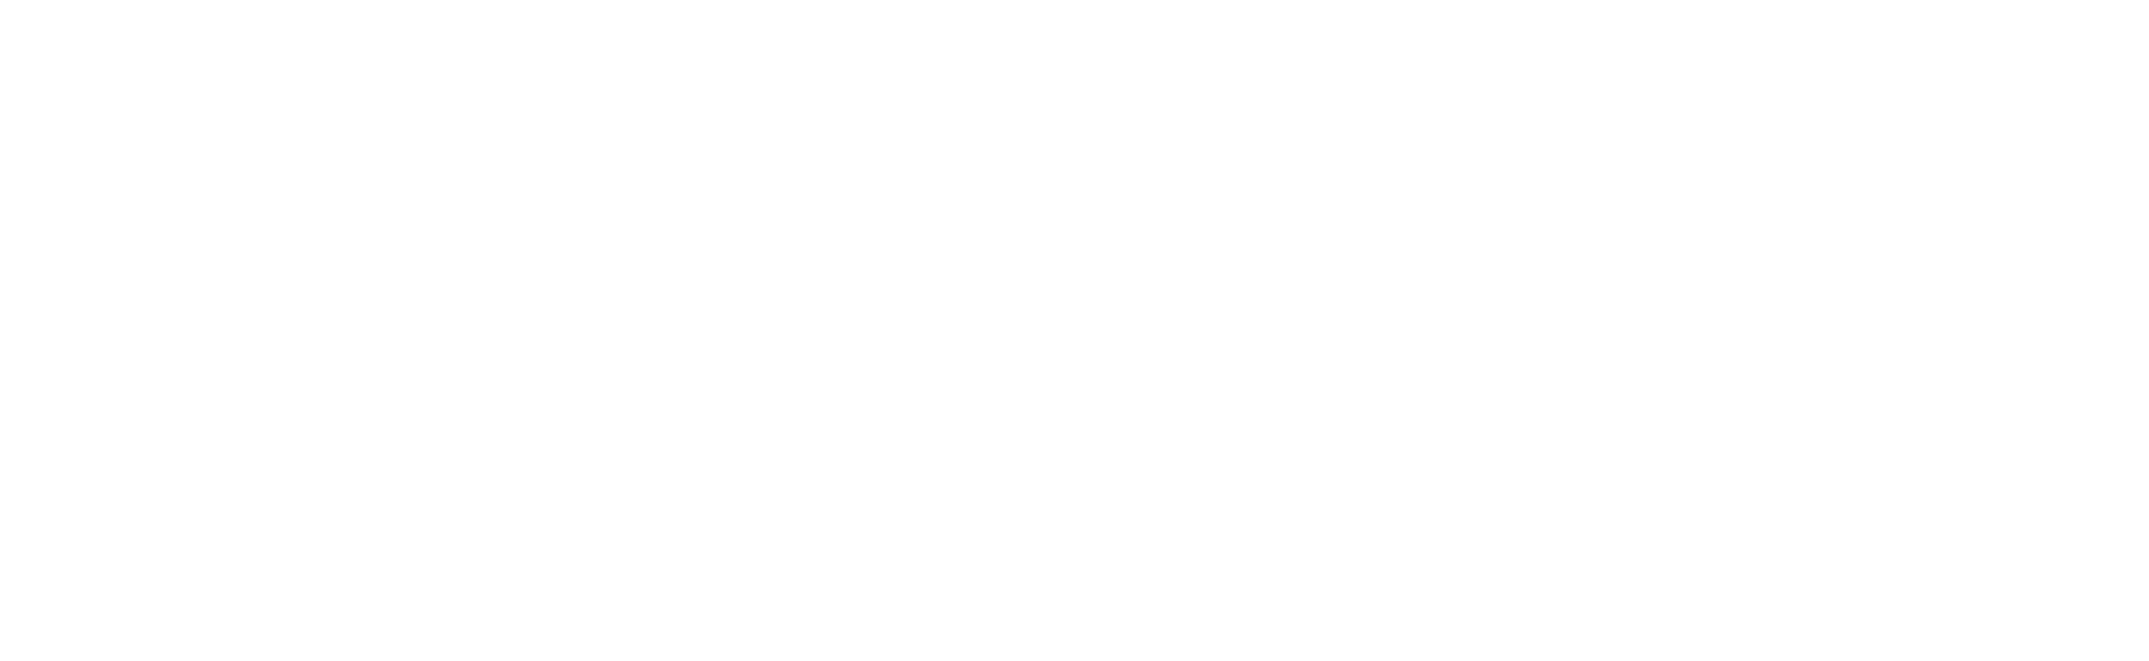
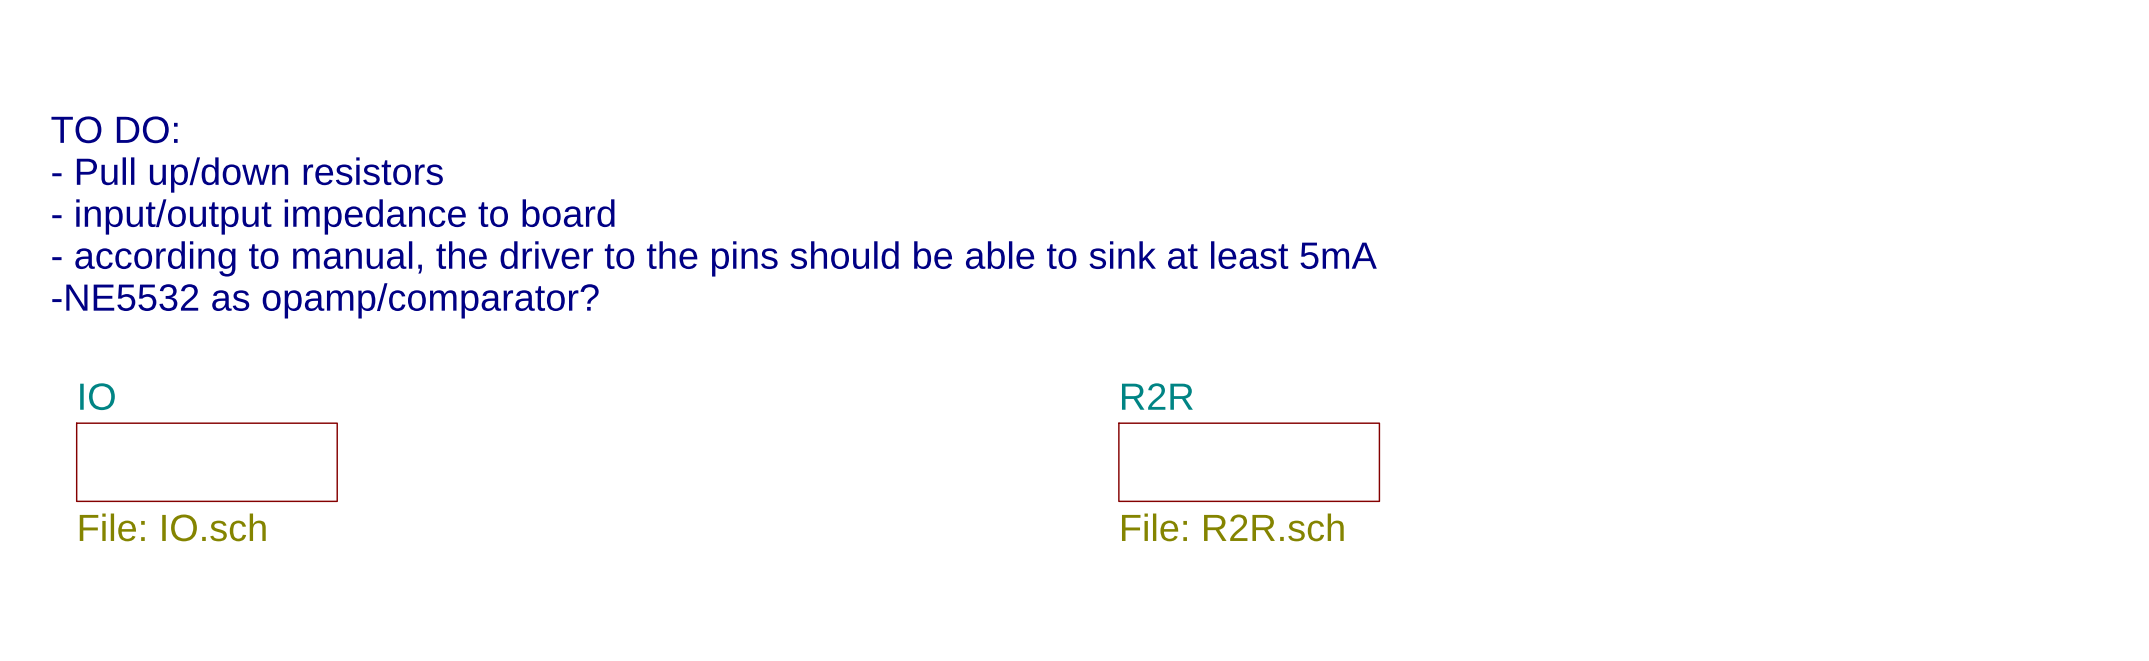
text: none -> TO DO: (114, 129)
text: none -> - Pull up/down resistors (247, 175)
text: none -> - input/output impedance to board (333, 216)
text: none -> - according to manual, the driver to the pins should be able to sink at least 5mA (714, 258)
text: none -> -NE5532 as opamp/comparator? (325, 300)
sheet IO: none -> File: IO.sch (206, 462)
sheet R2R: none -> File: R2R.sch (1249, 462)

